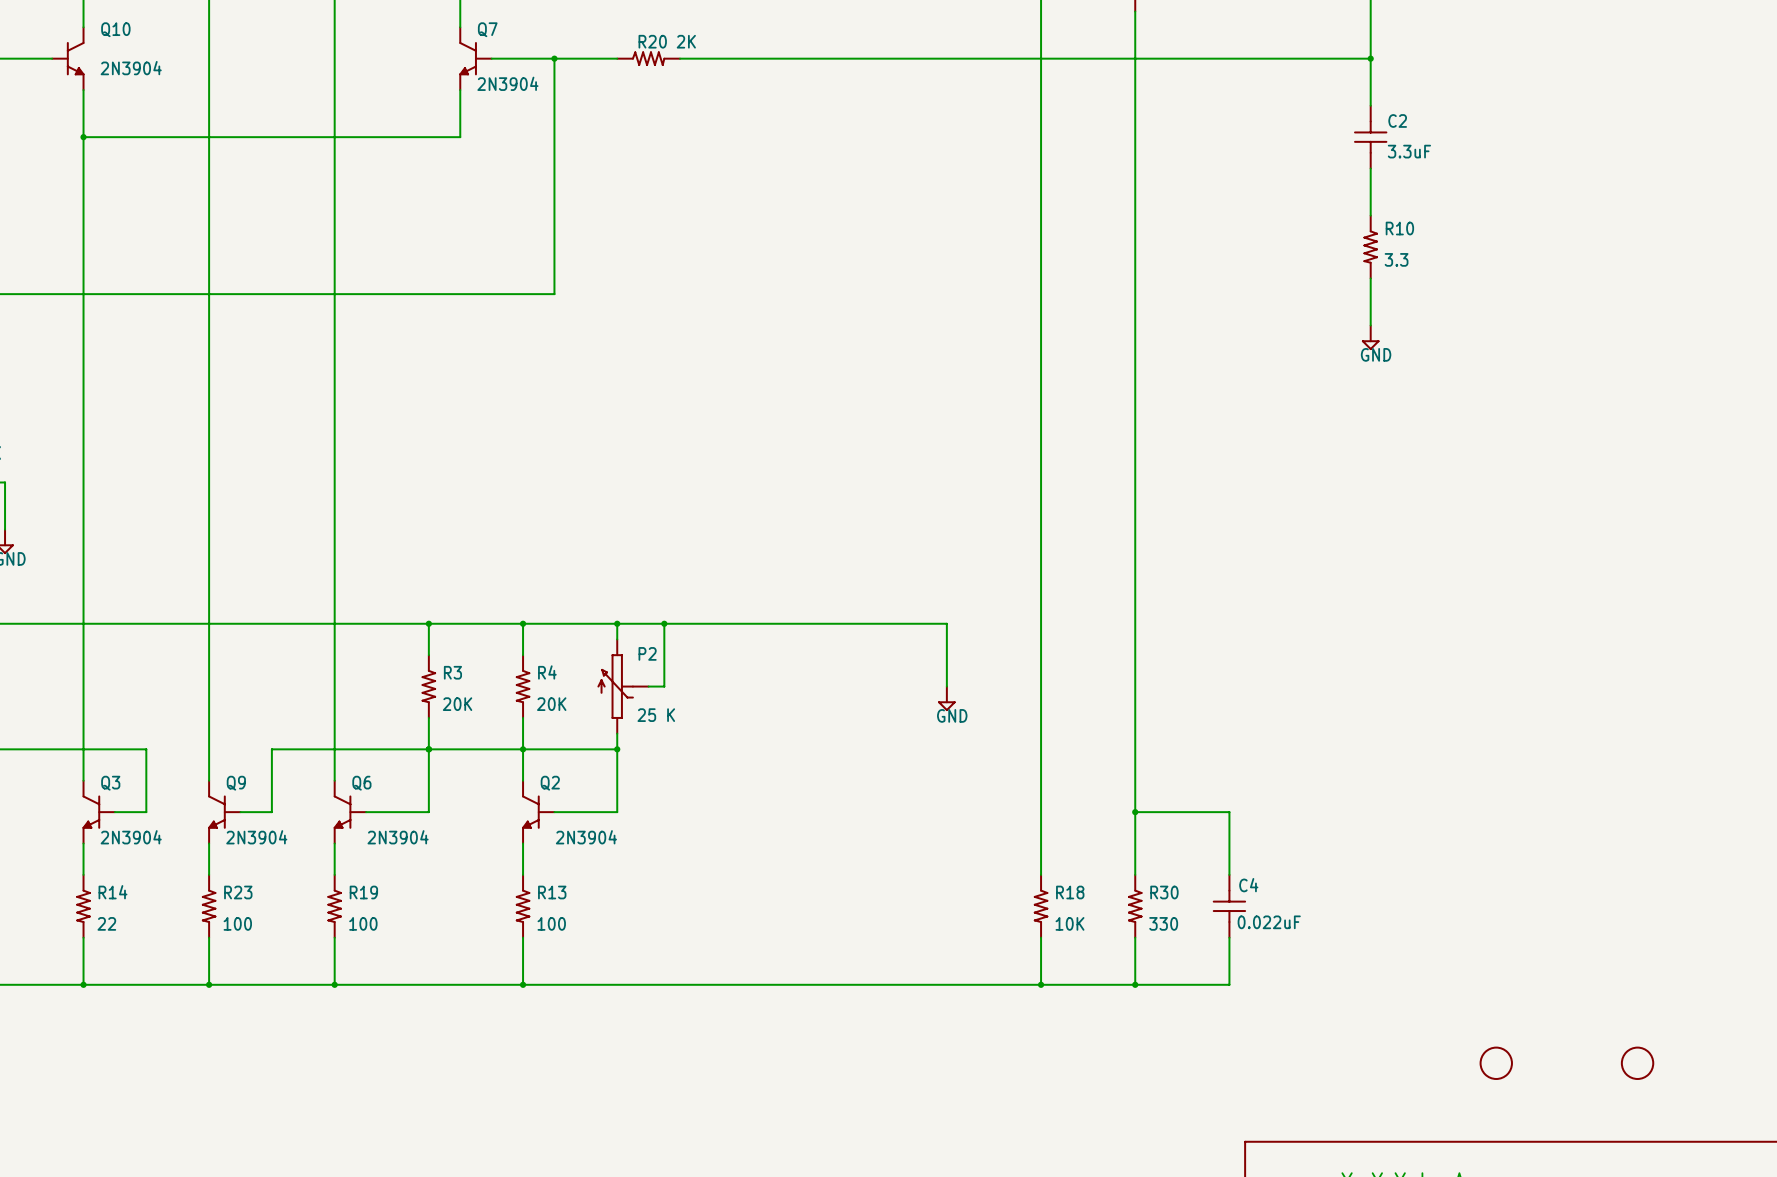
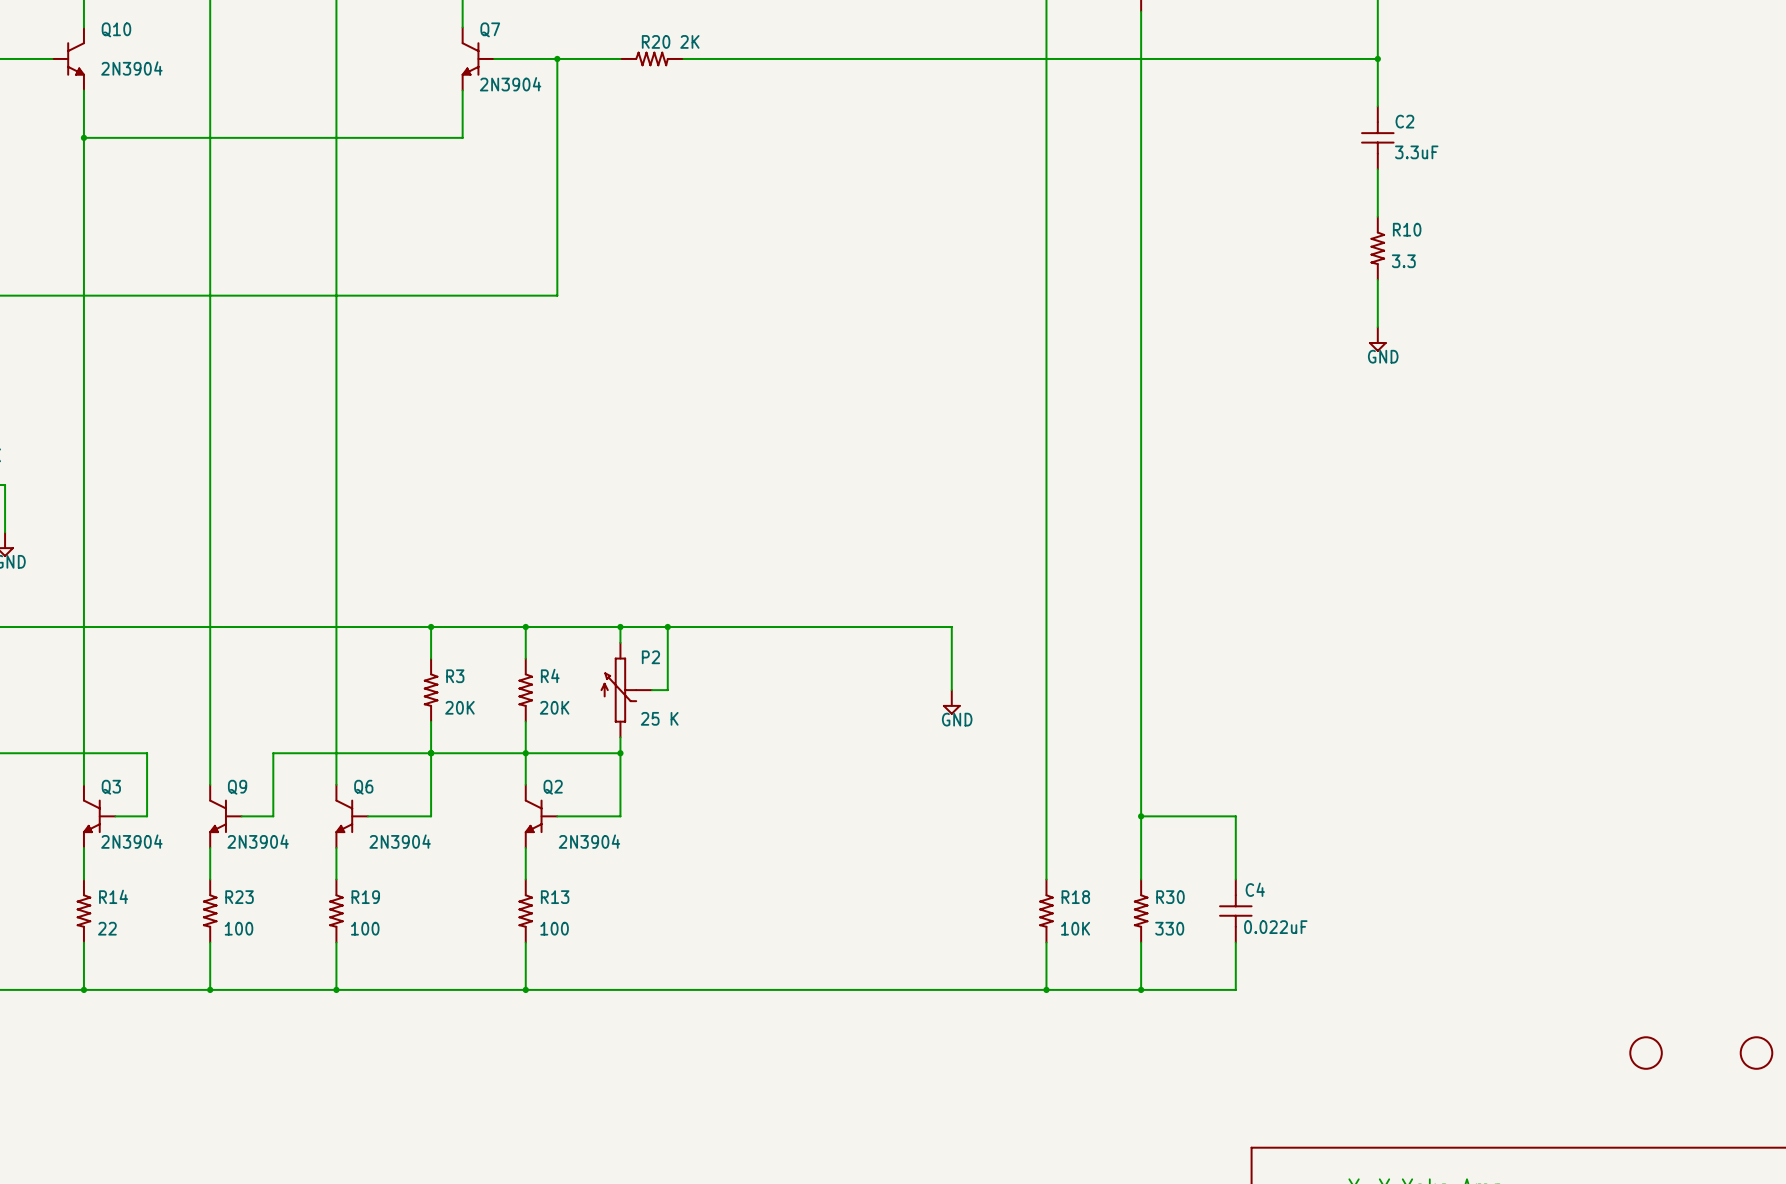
part: none -> (1756, 1053)
part: (1496, 1063) -> none
part position: (1637, 1063) -> (1646, 1053)

